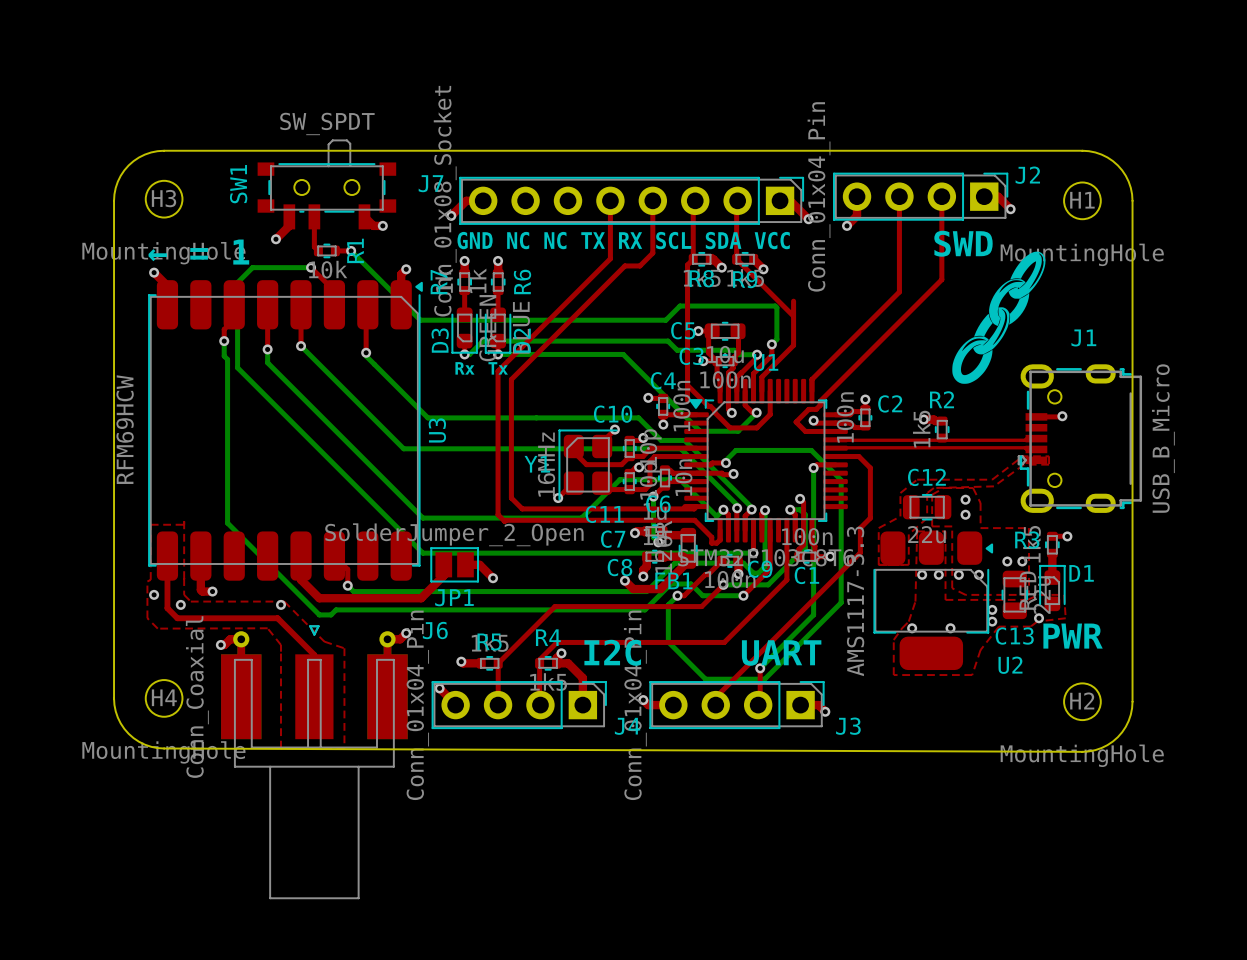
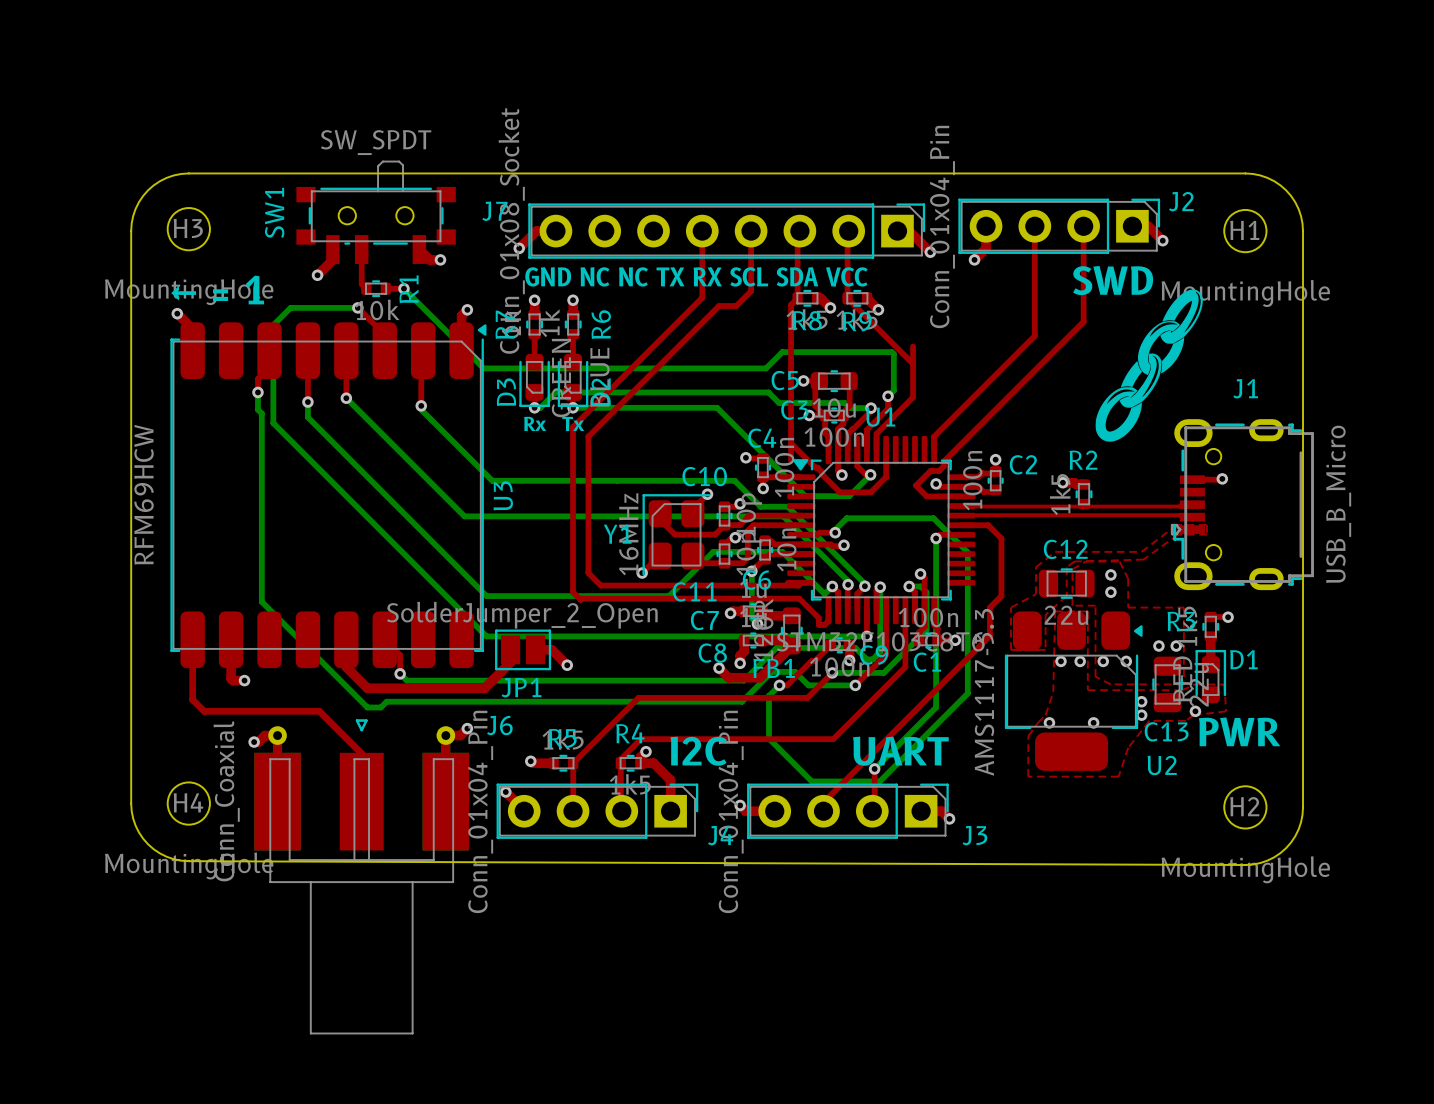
top zone outline: (184, 521) (184, 594) (190, 601) (284, 601) (324, 641) (344, 648) (344, 748) (280, 748) (280, 644) (267, 628) (157, 628) (147, 618) (147, 581) (150, 579) (150, 524) (184, 524) -> none
via: (154, 594) -> none
via: (180, 604) -> none
via: (280, 604) -> none

